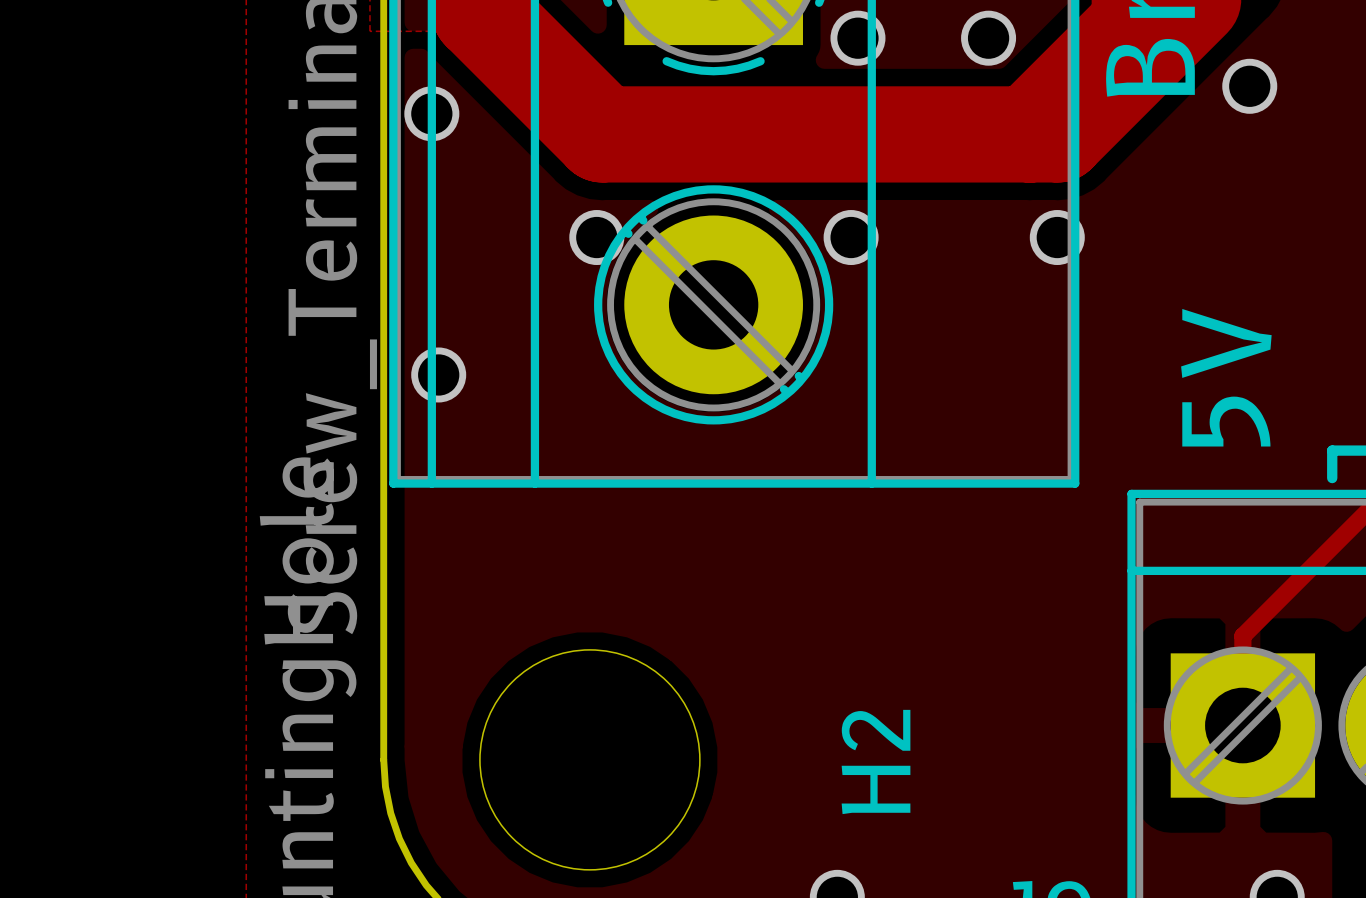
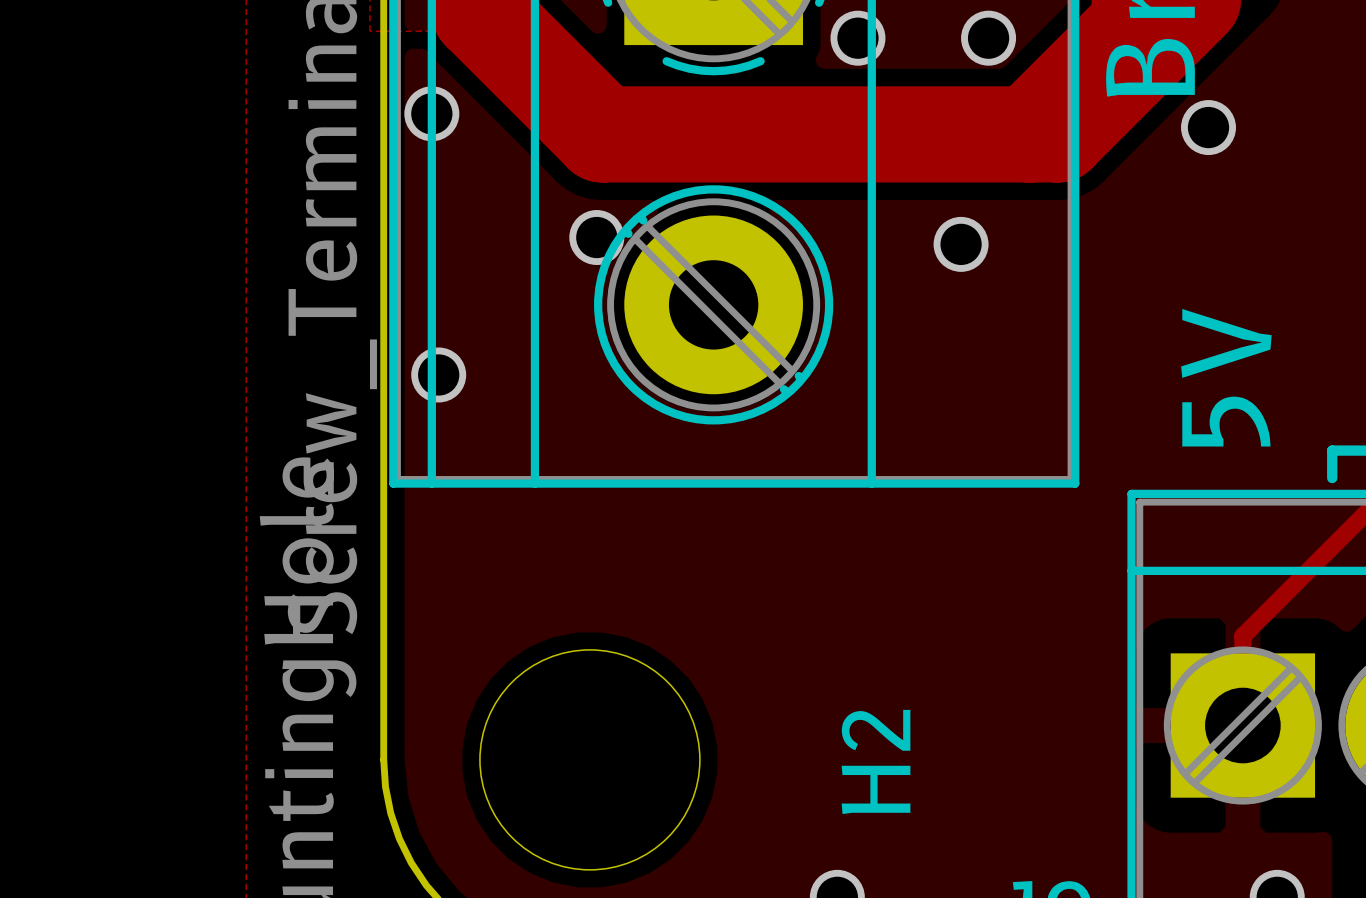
via position: (1249, 86) -> (1208, 127)
via: (851, 237) -> none
via: (1057, 237) -> none
via: none -> (961, 244)

